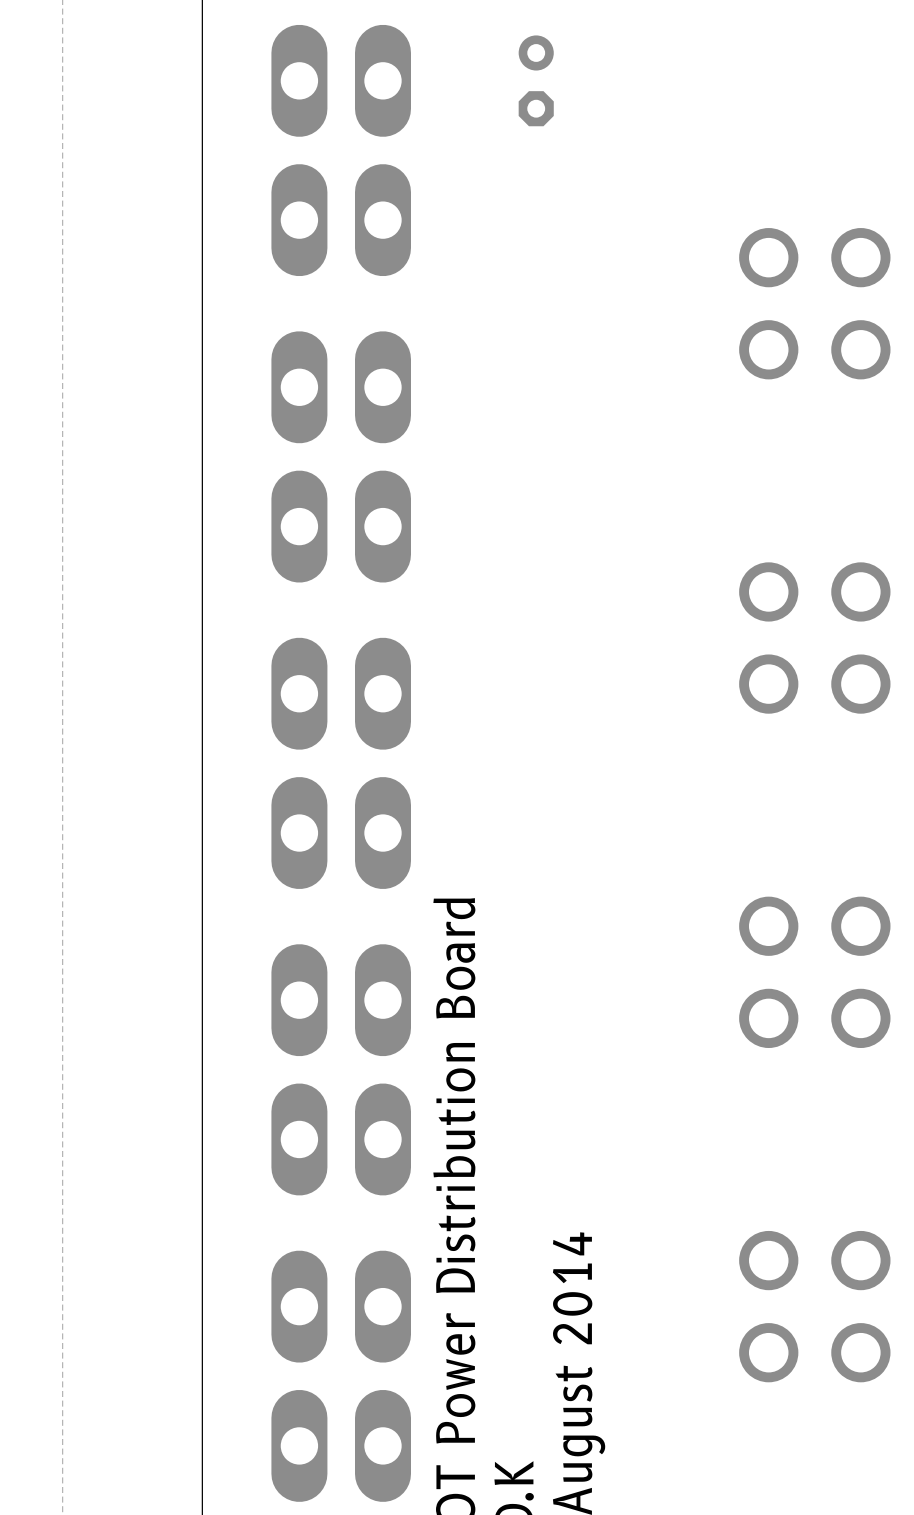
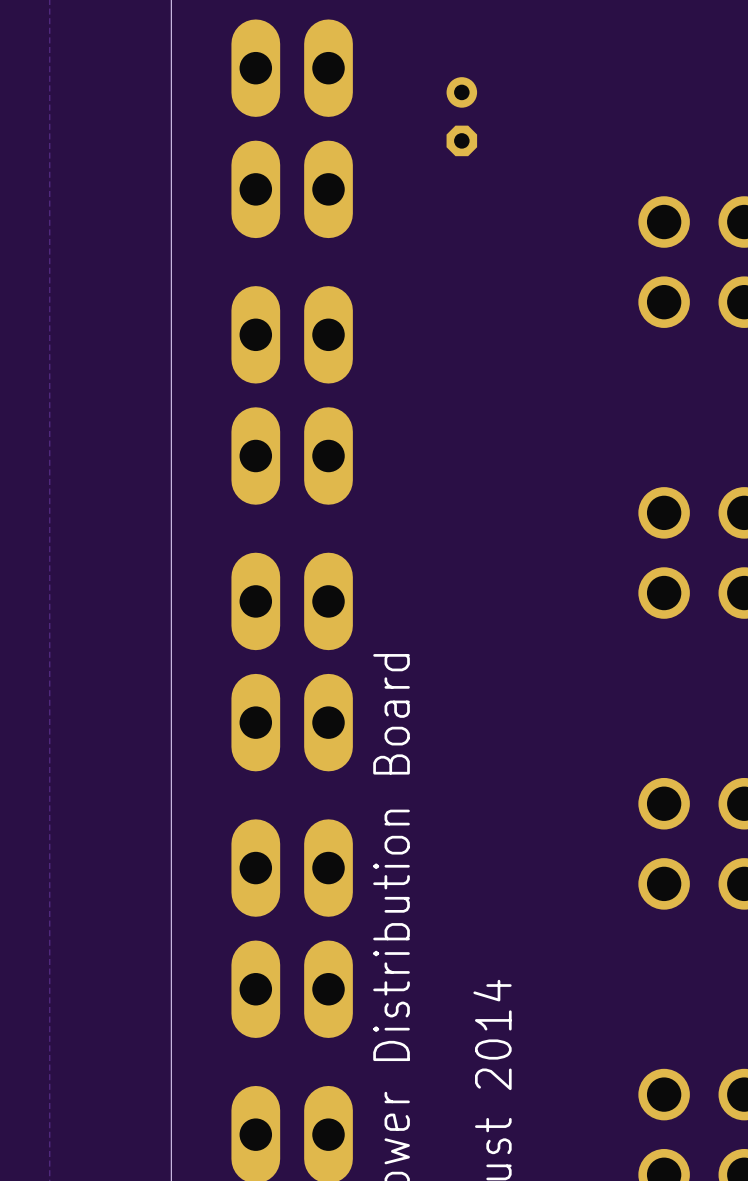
part position: (536, 80) -> (461, 116)

